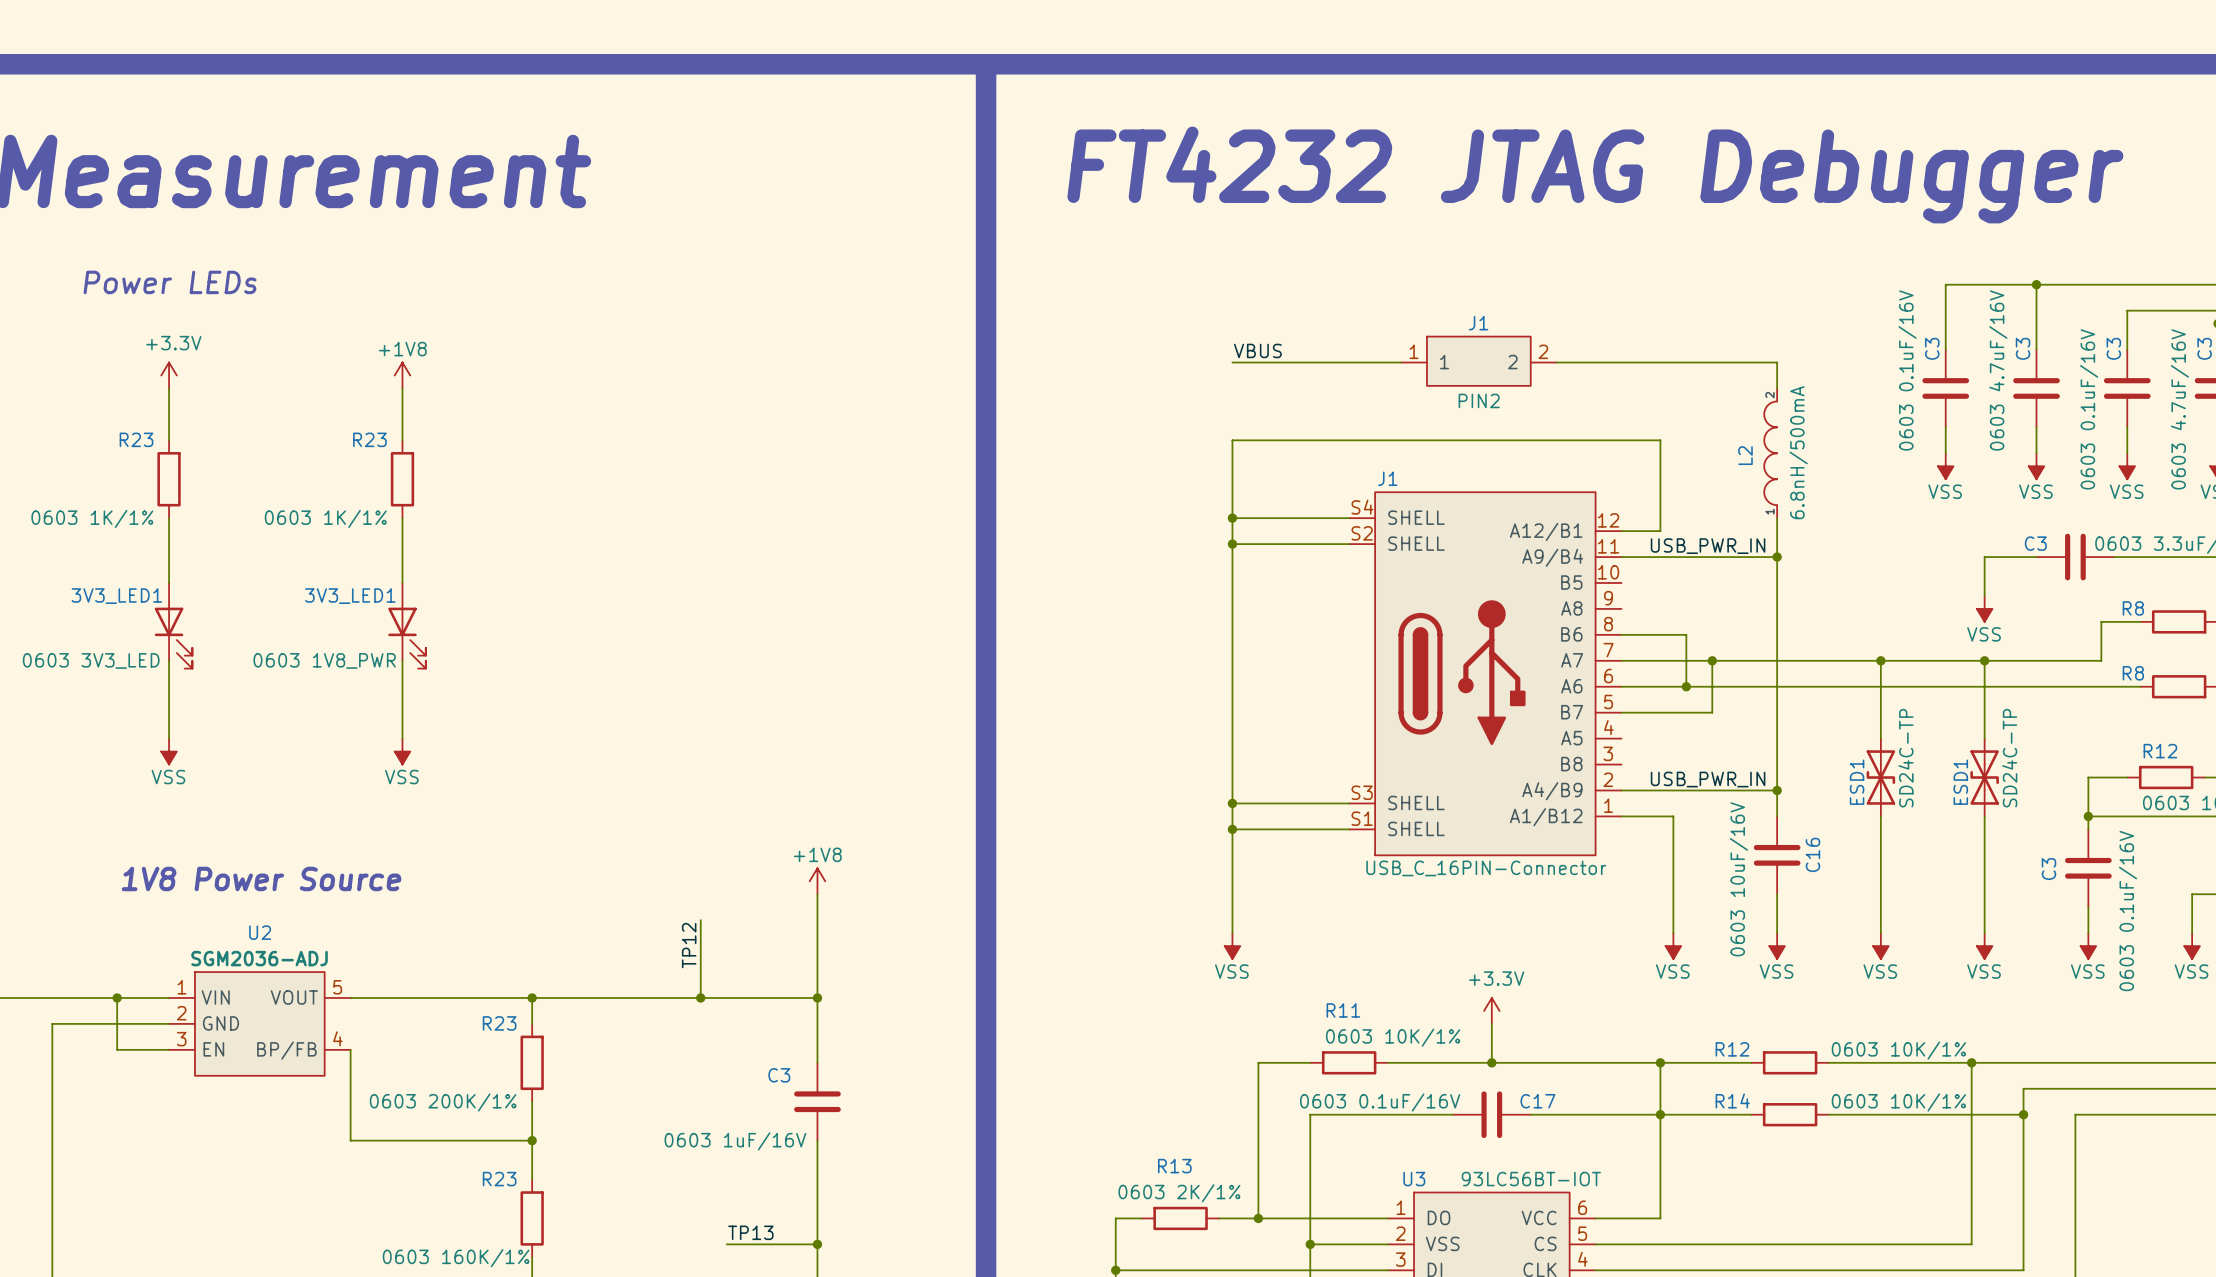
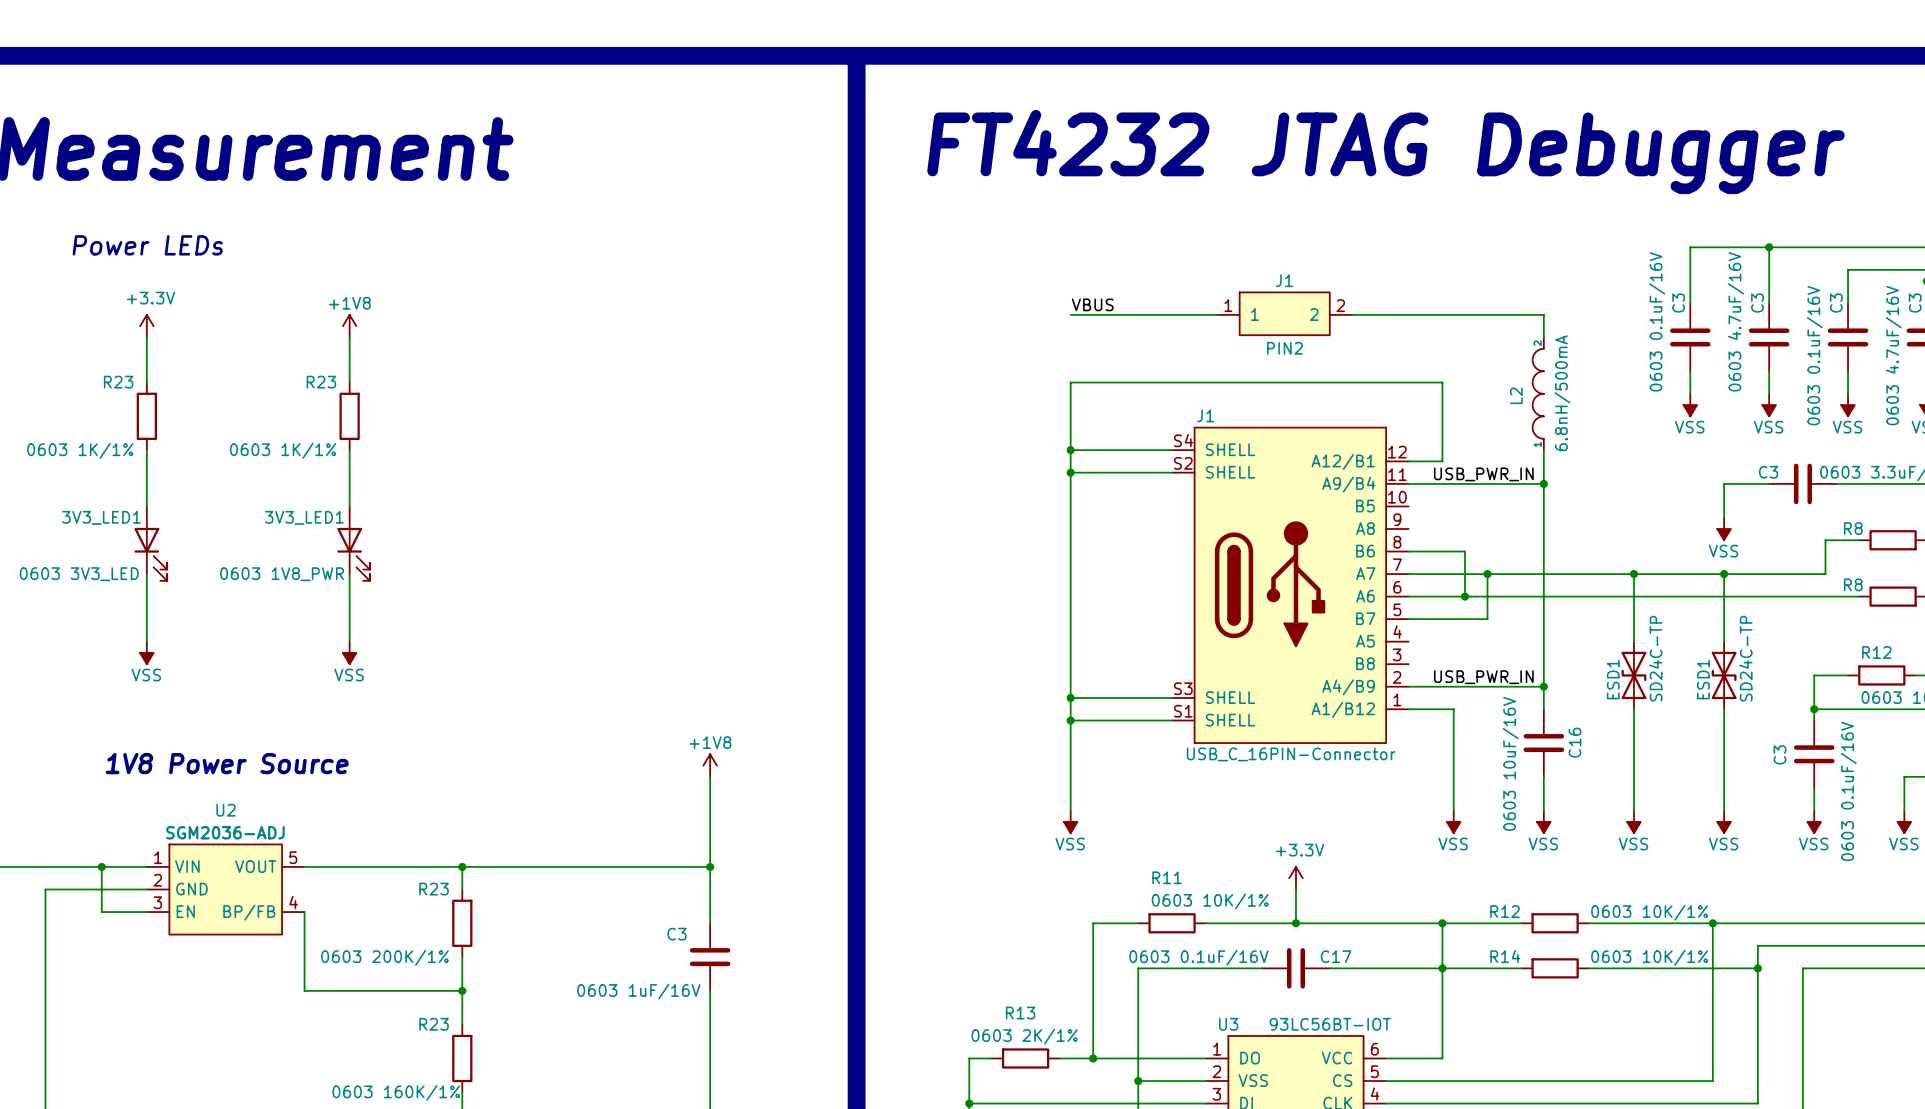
wire: (700, 920) (700, 997) -> none
label: TP12 (689, 945) -> none
junction: (700, 997) -> none
label: TP13 (750, 1232) -> none
wire: (726, 1244) (817, 1244) -> none
junction: (817, 1244) -> none

